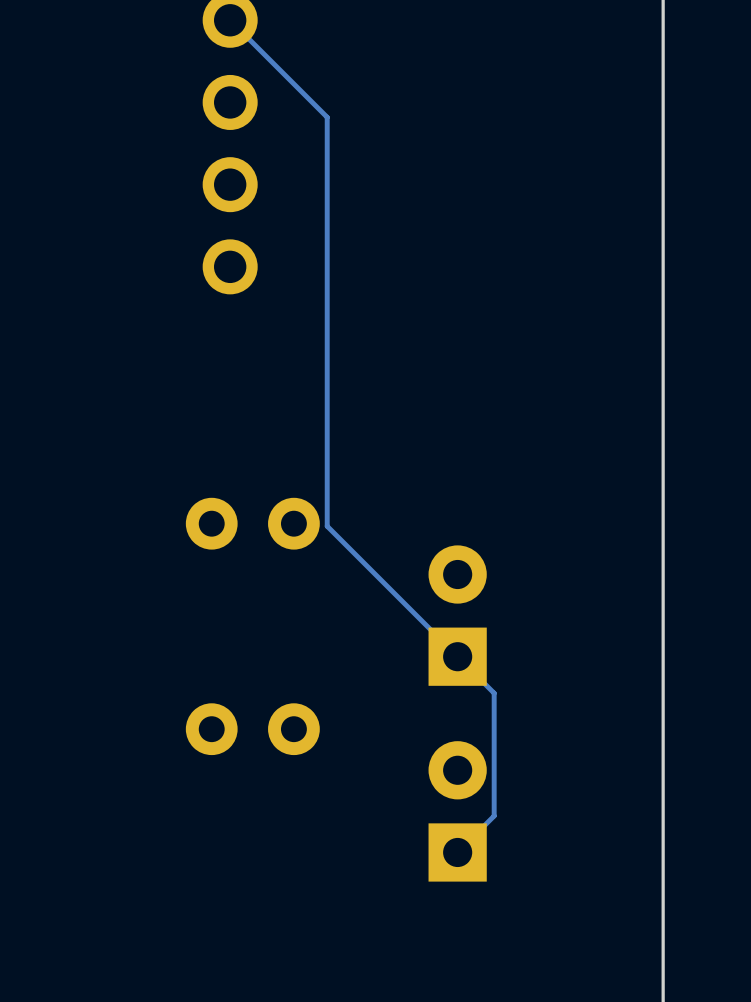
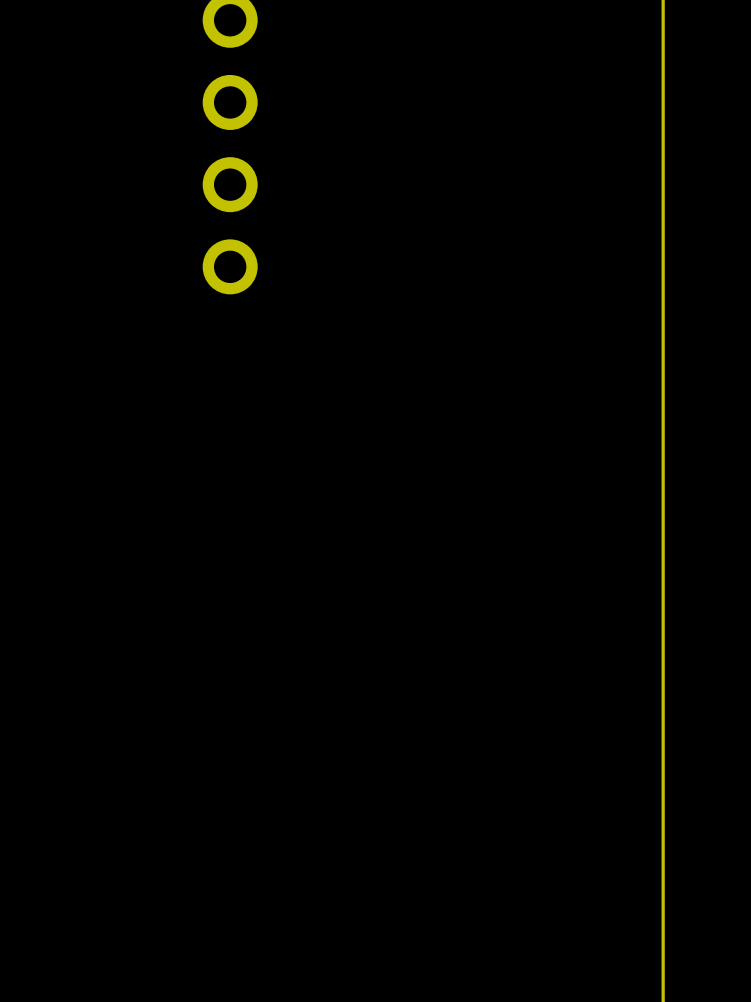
track: (230, 20) (327, 117) (327, 526) (494, 693) (494, 815) (457, 852) -> none
part: (252, 523) -> none
part: (457, 615) -> none
part: (252, 729) -> none
part: (457, 811) -> none

